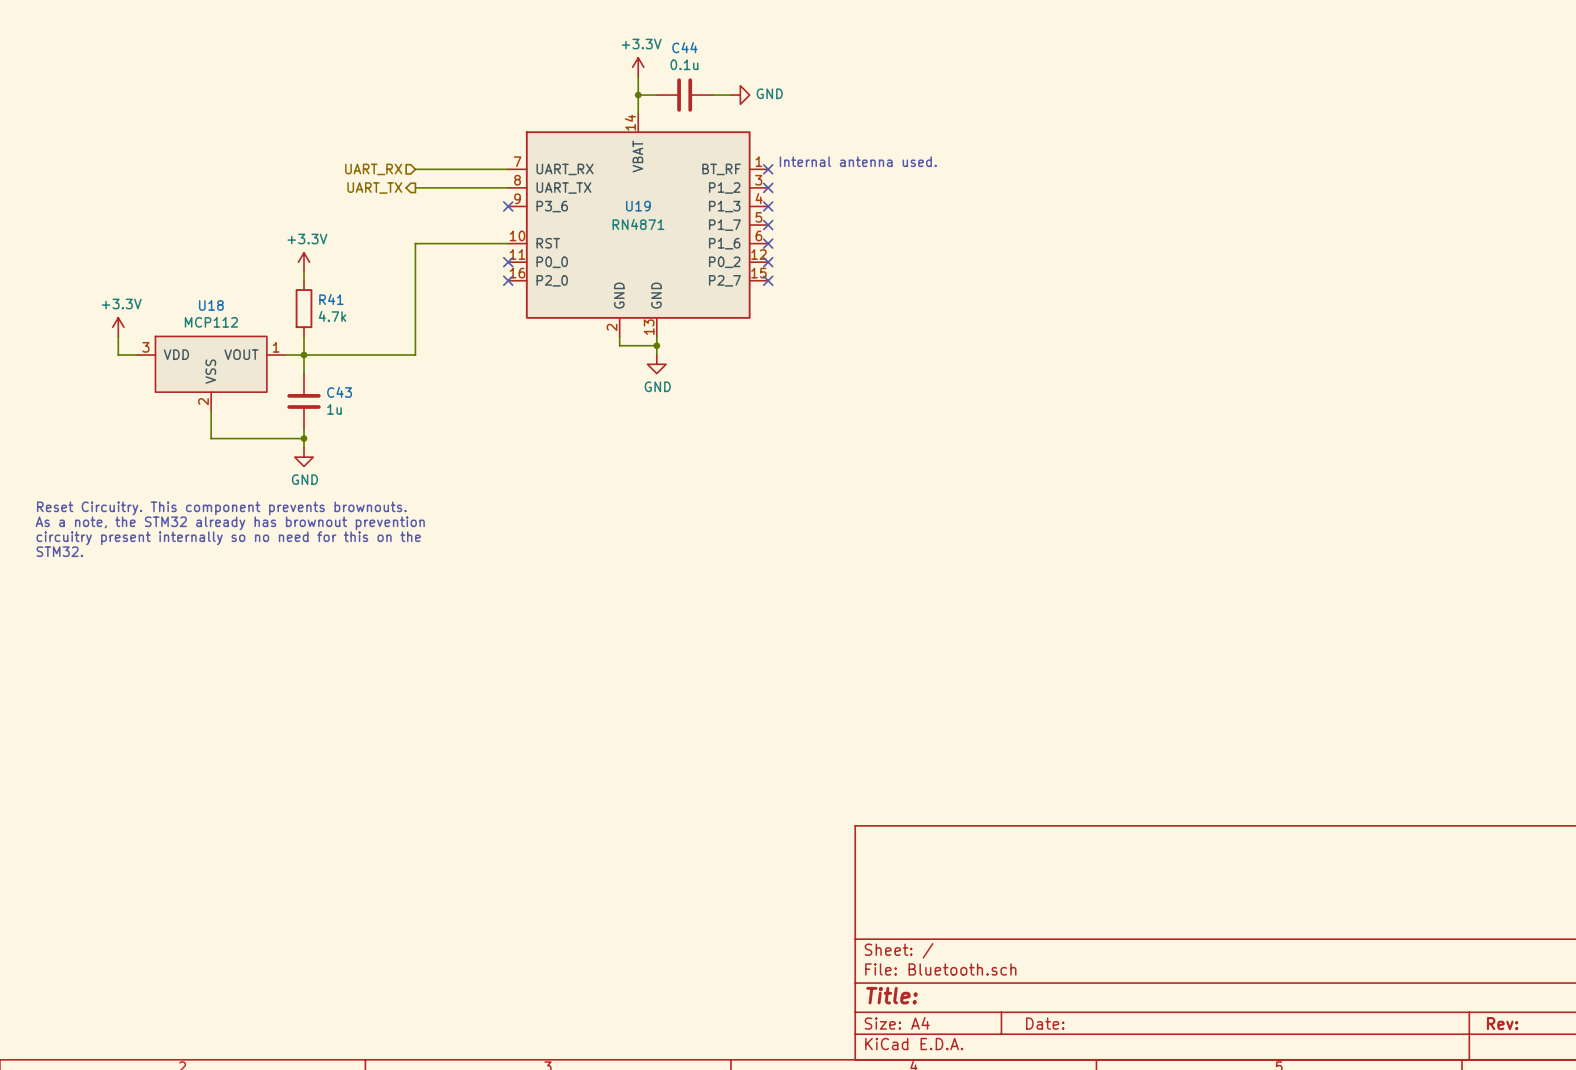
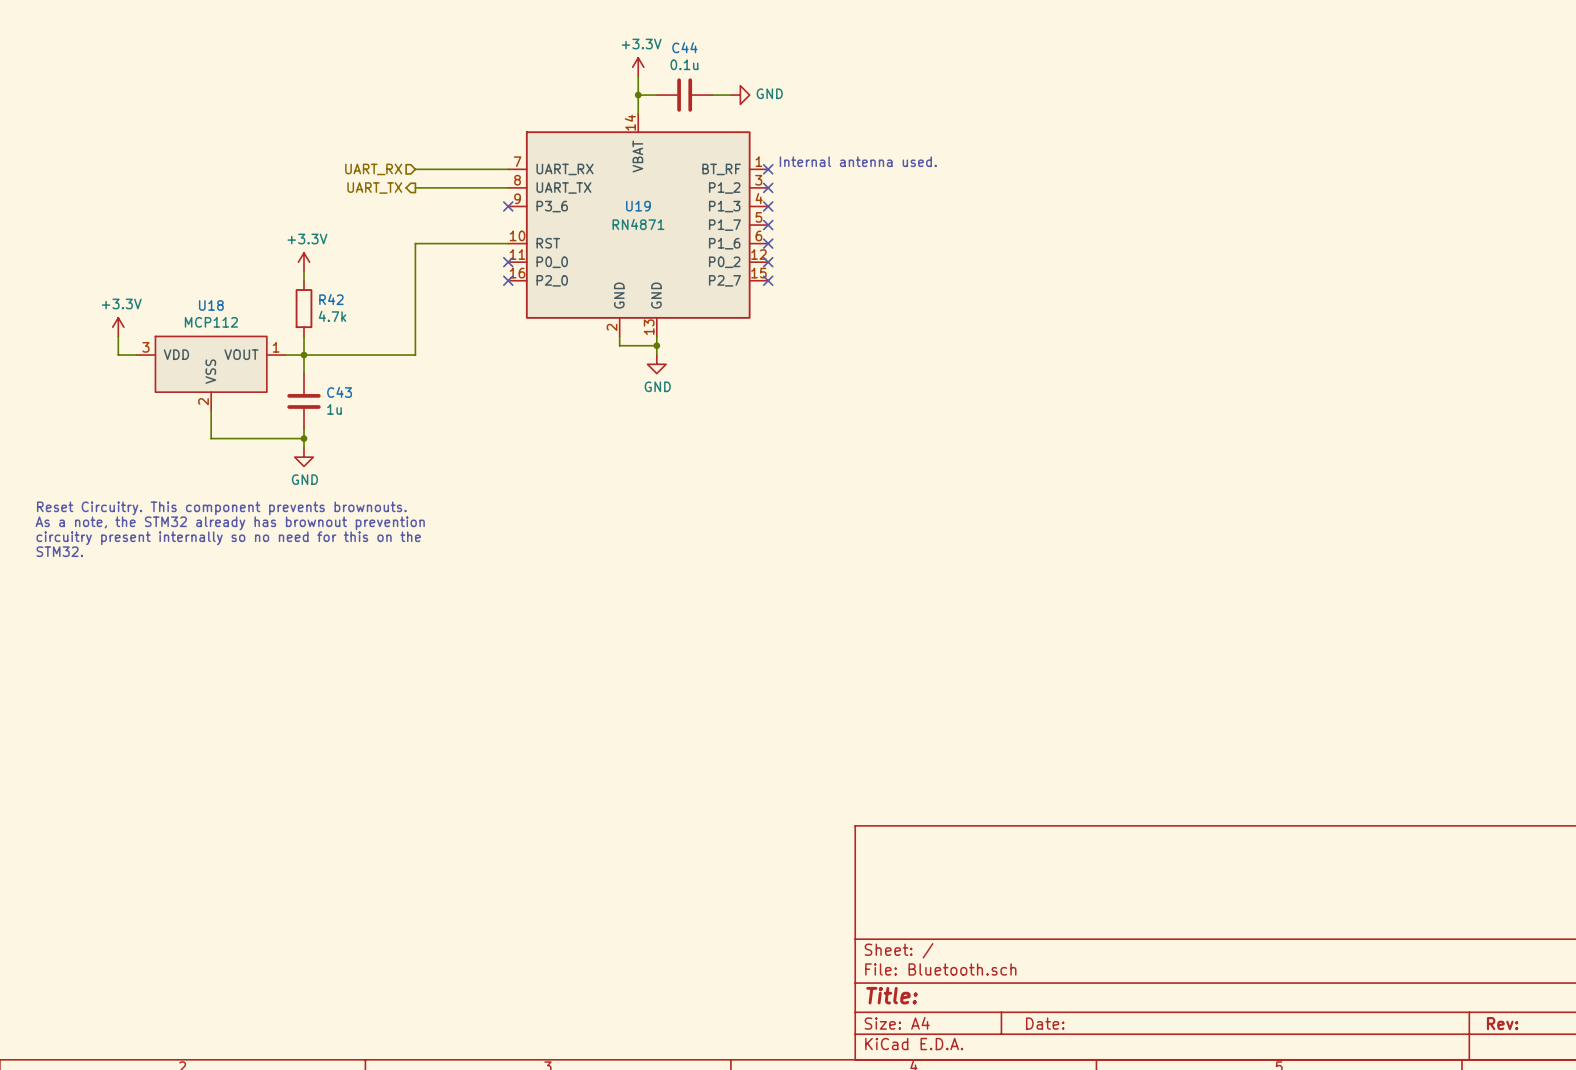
R41 name: R41 (331, 299) -> R42 (331, 299)

